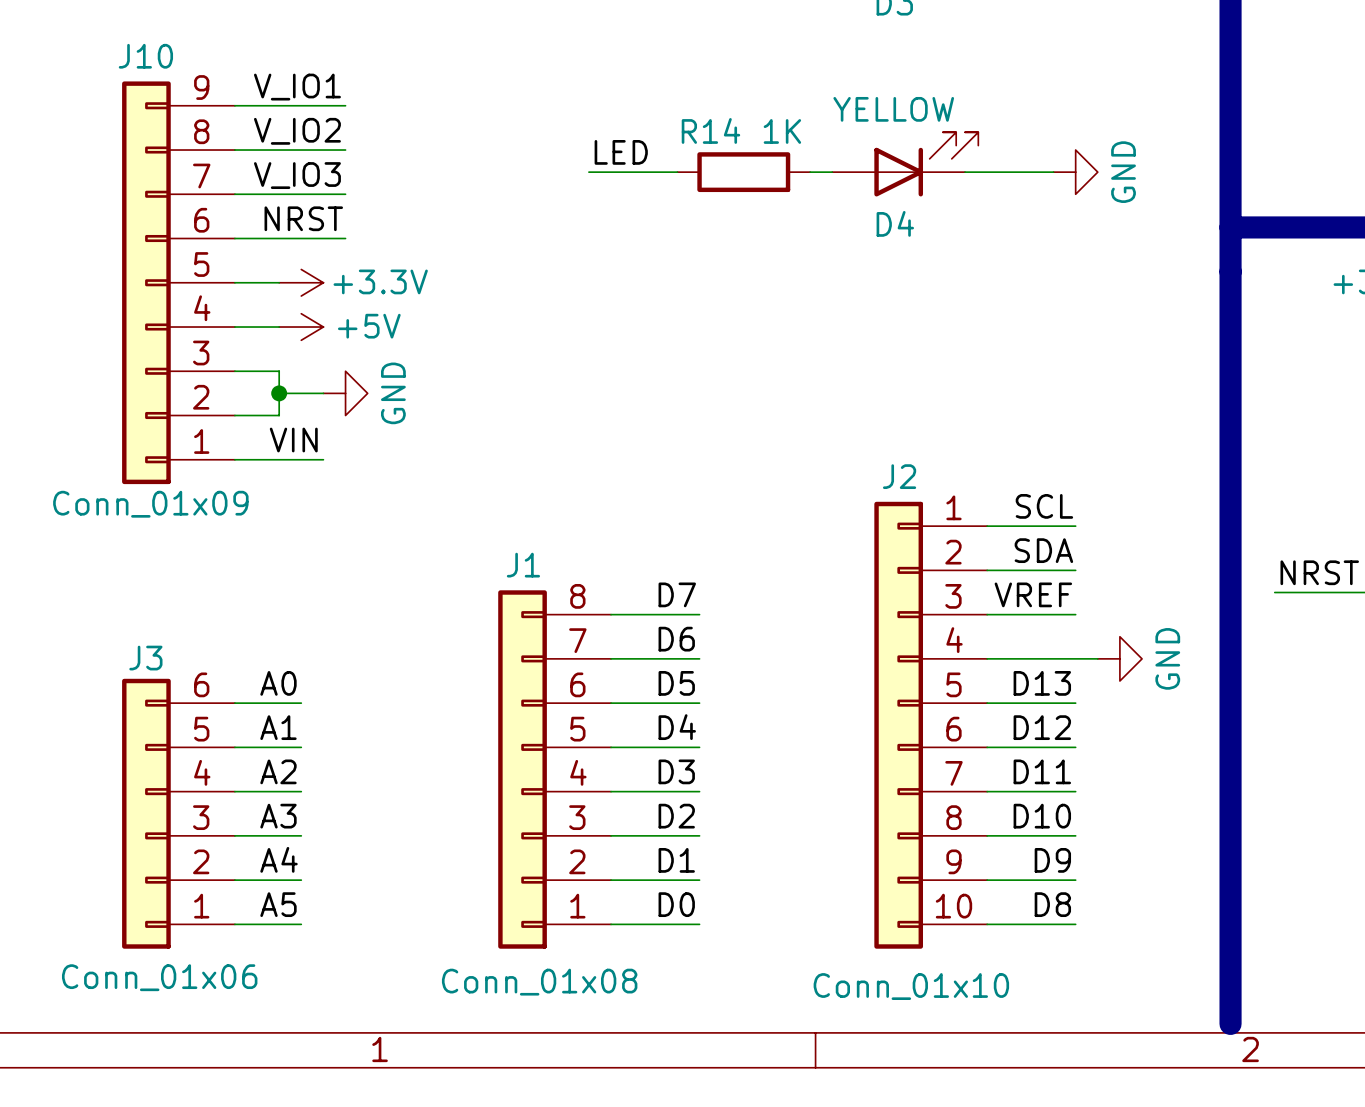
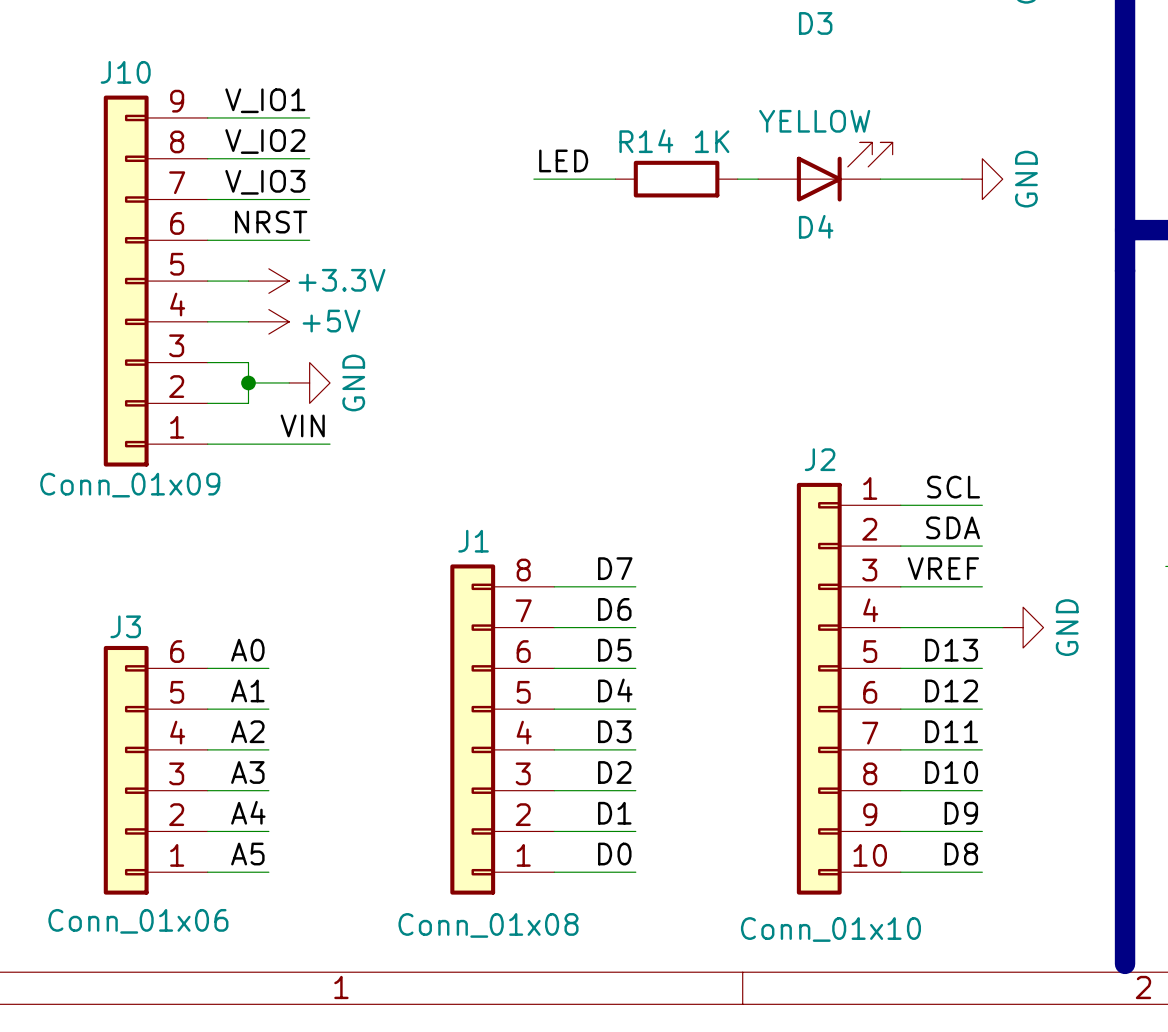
label position: VIN (293, 440) -> VIN (302, 425)
wire: none -> (289, 444) (330, 444)

